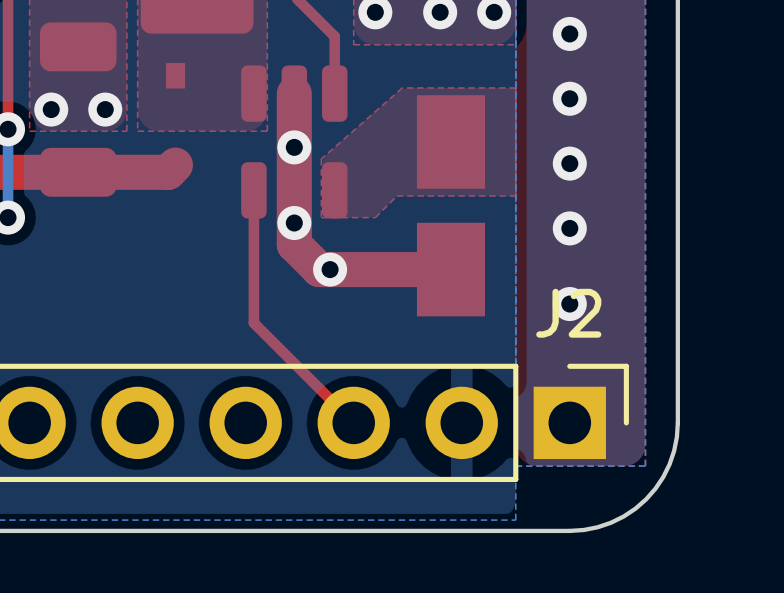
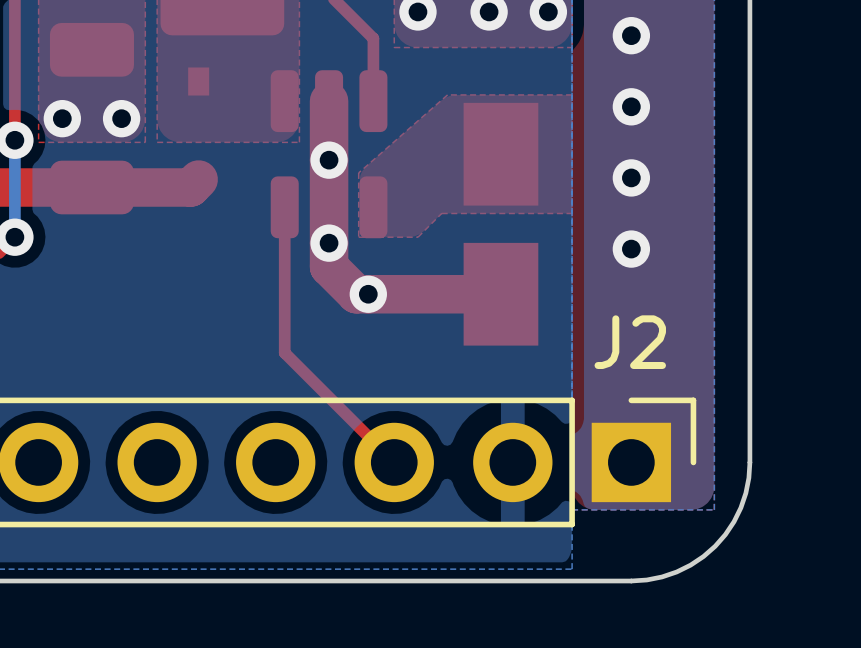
via: (569, 304) -> none

